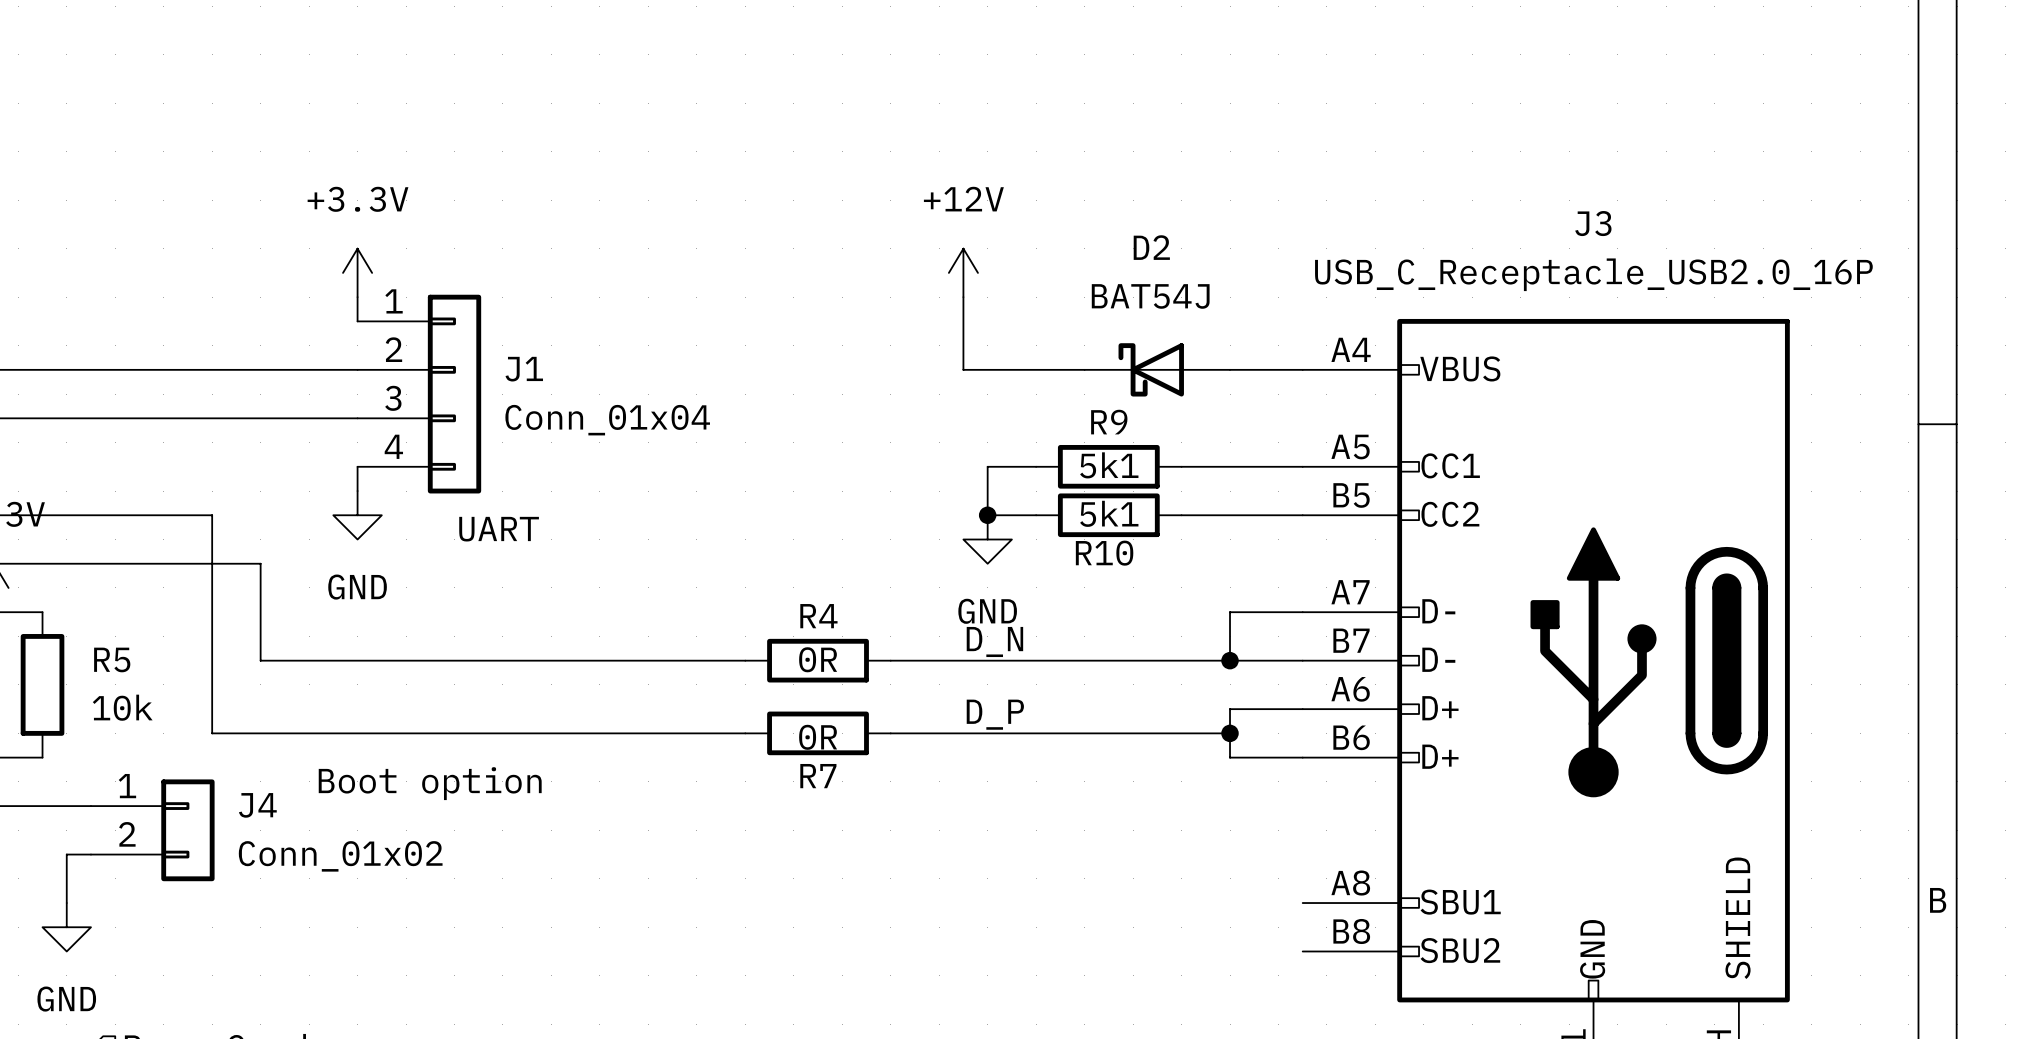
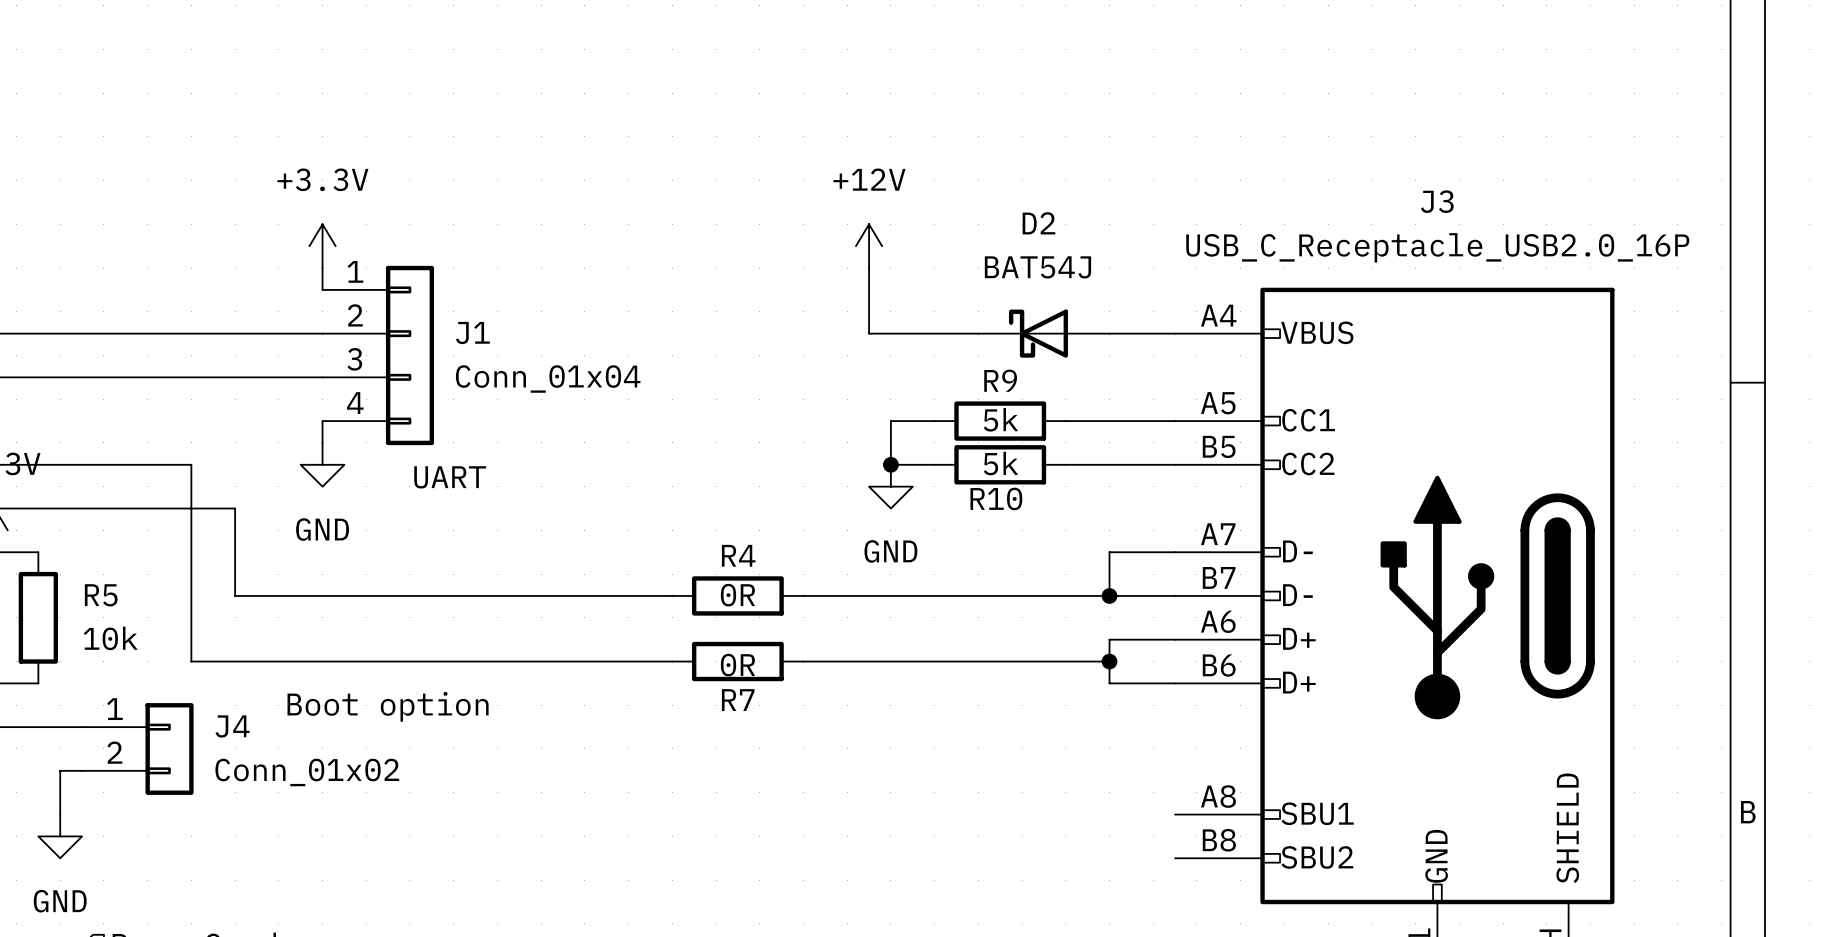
R9 value: 5k1 (1109, 465) -> 5k (1000, 419)
R10 value: 5k1 (1109, 513) -> 5k (1000, 463)
label: D_N (994, 641) -> none
label: D_P (995, 714) -> none

